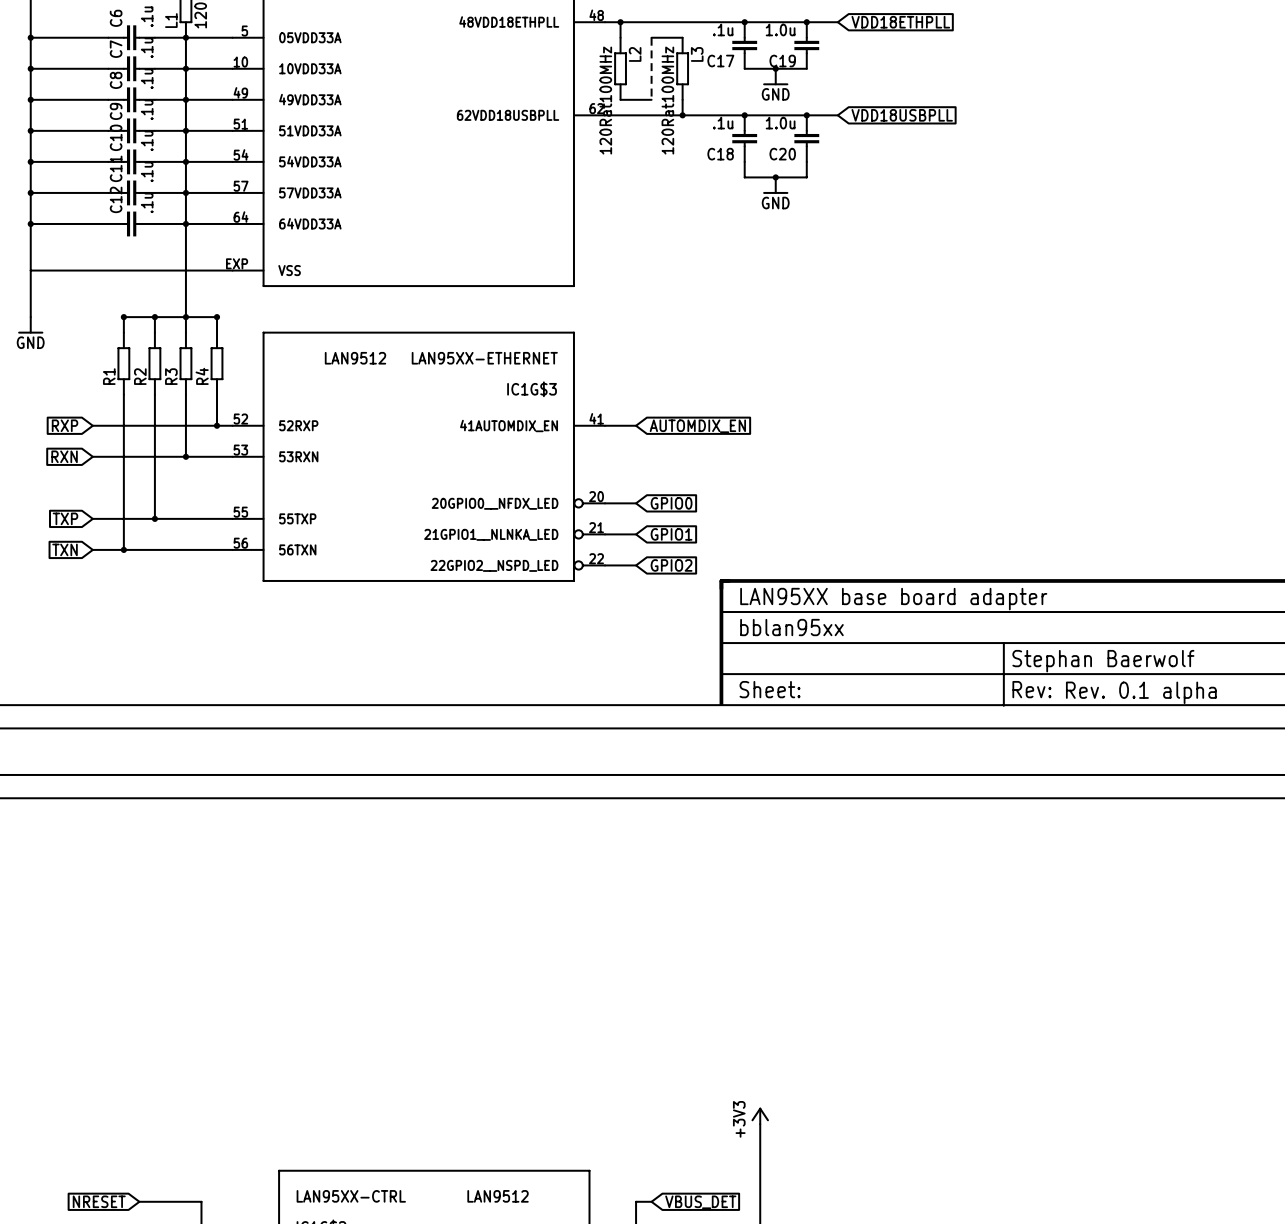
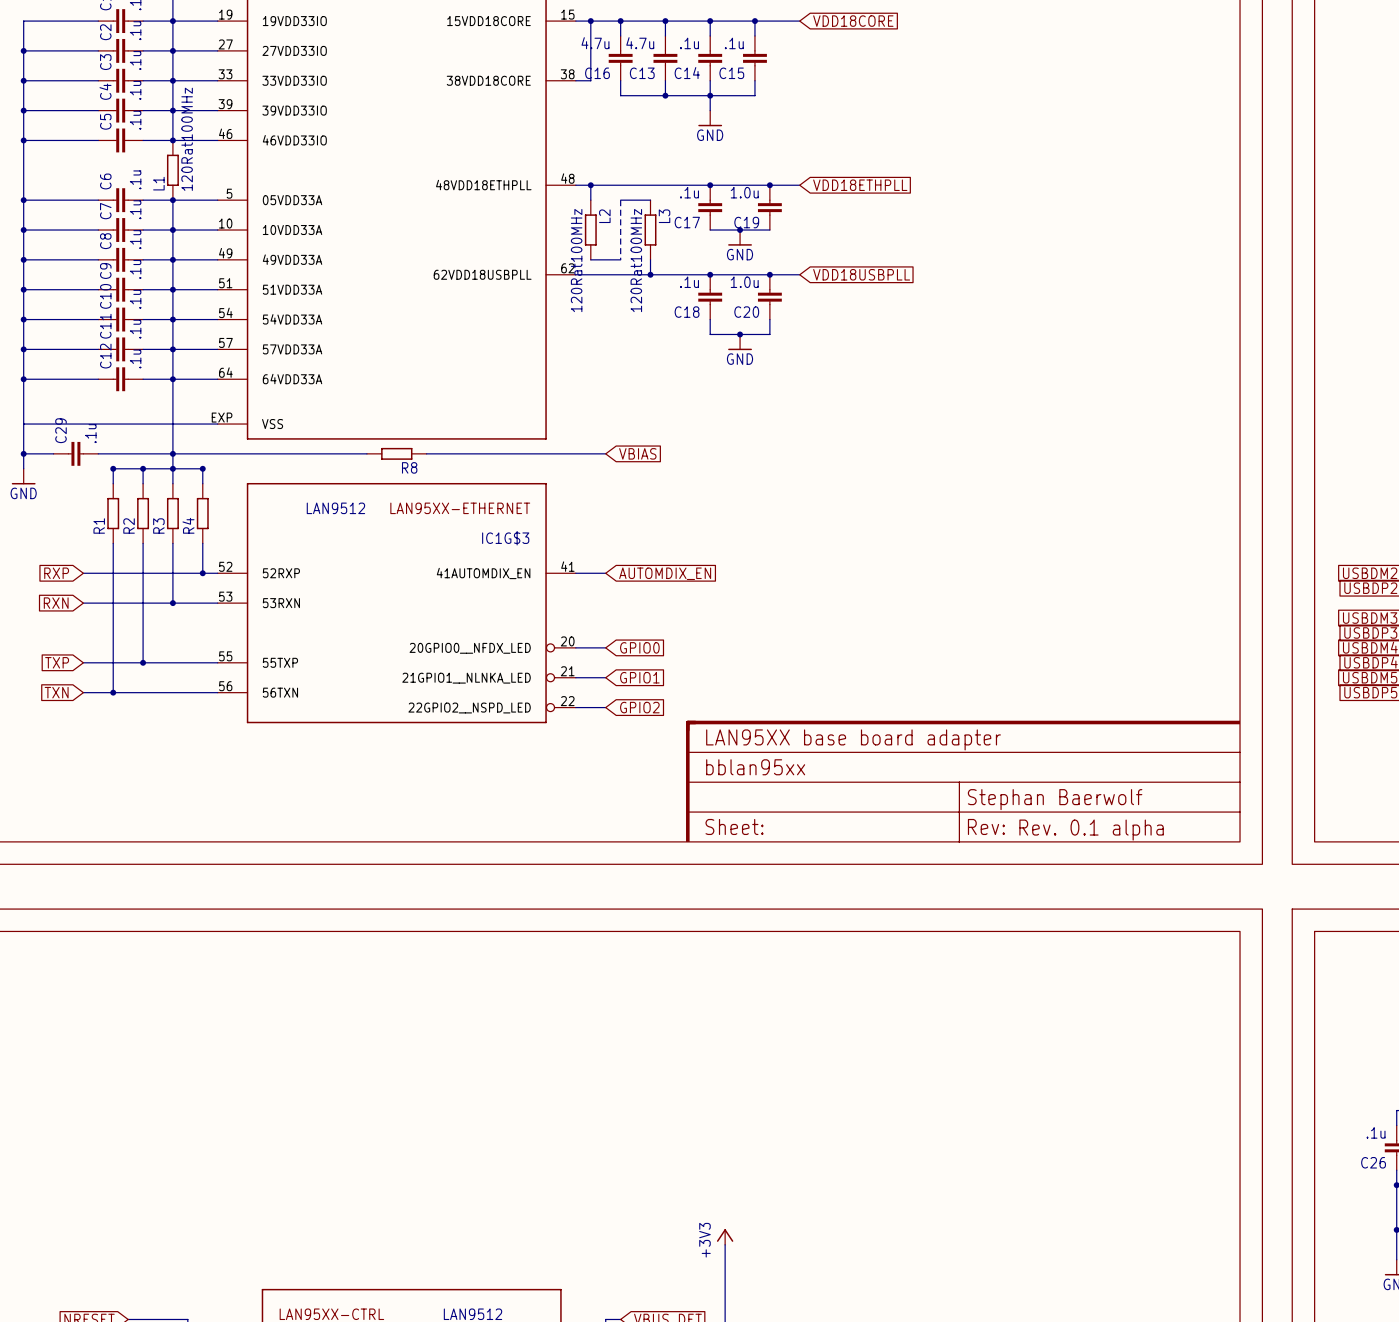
wire: none -> (23, 453) (53, 453)
junction: none -> (23, 453)
C29: none -> .1u (75, 453)
wire: none -> (98, 453) (366, 453)
junction: none -> (172, 453)
R8: none -> (396, 453)
wire: none -> (426, 453) (605, 453)
global label: none -> VBIAS (637, 453)

